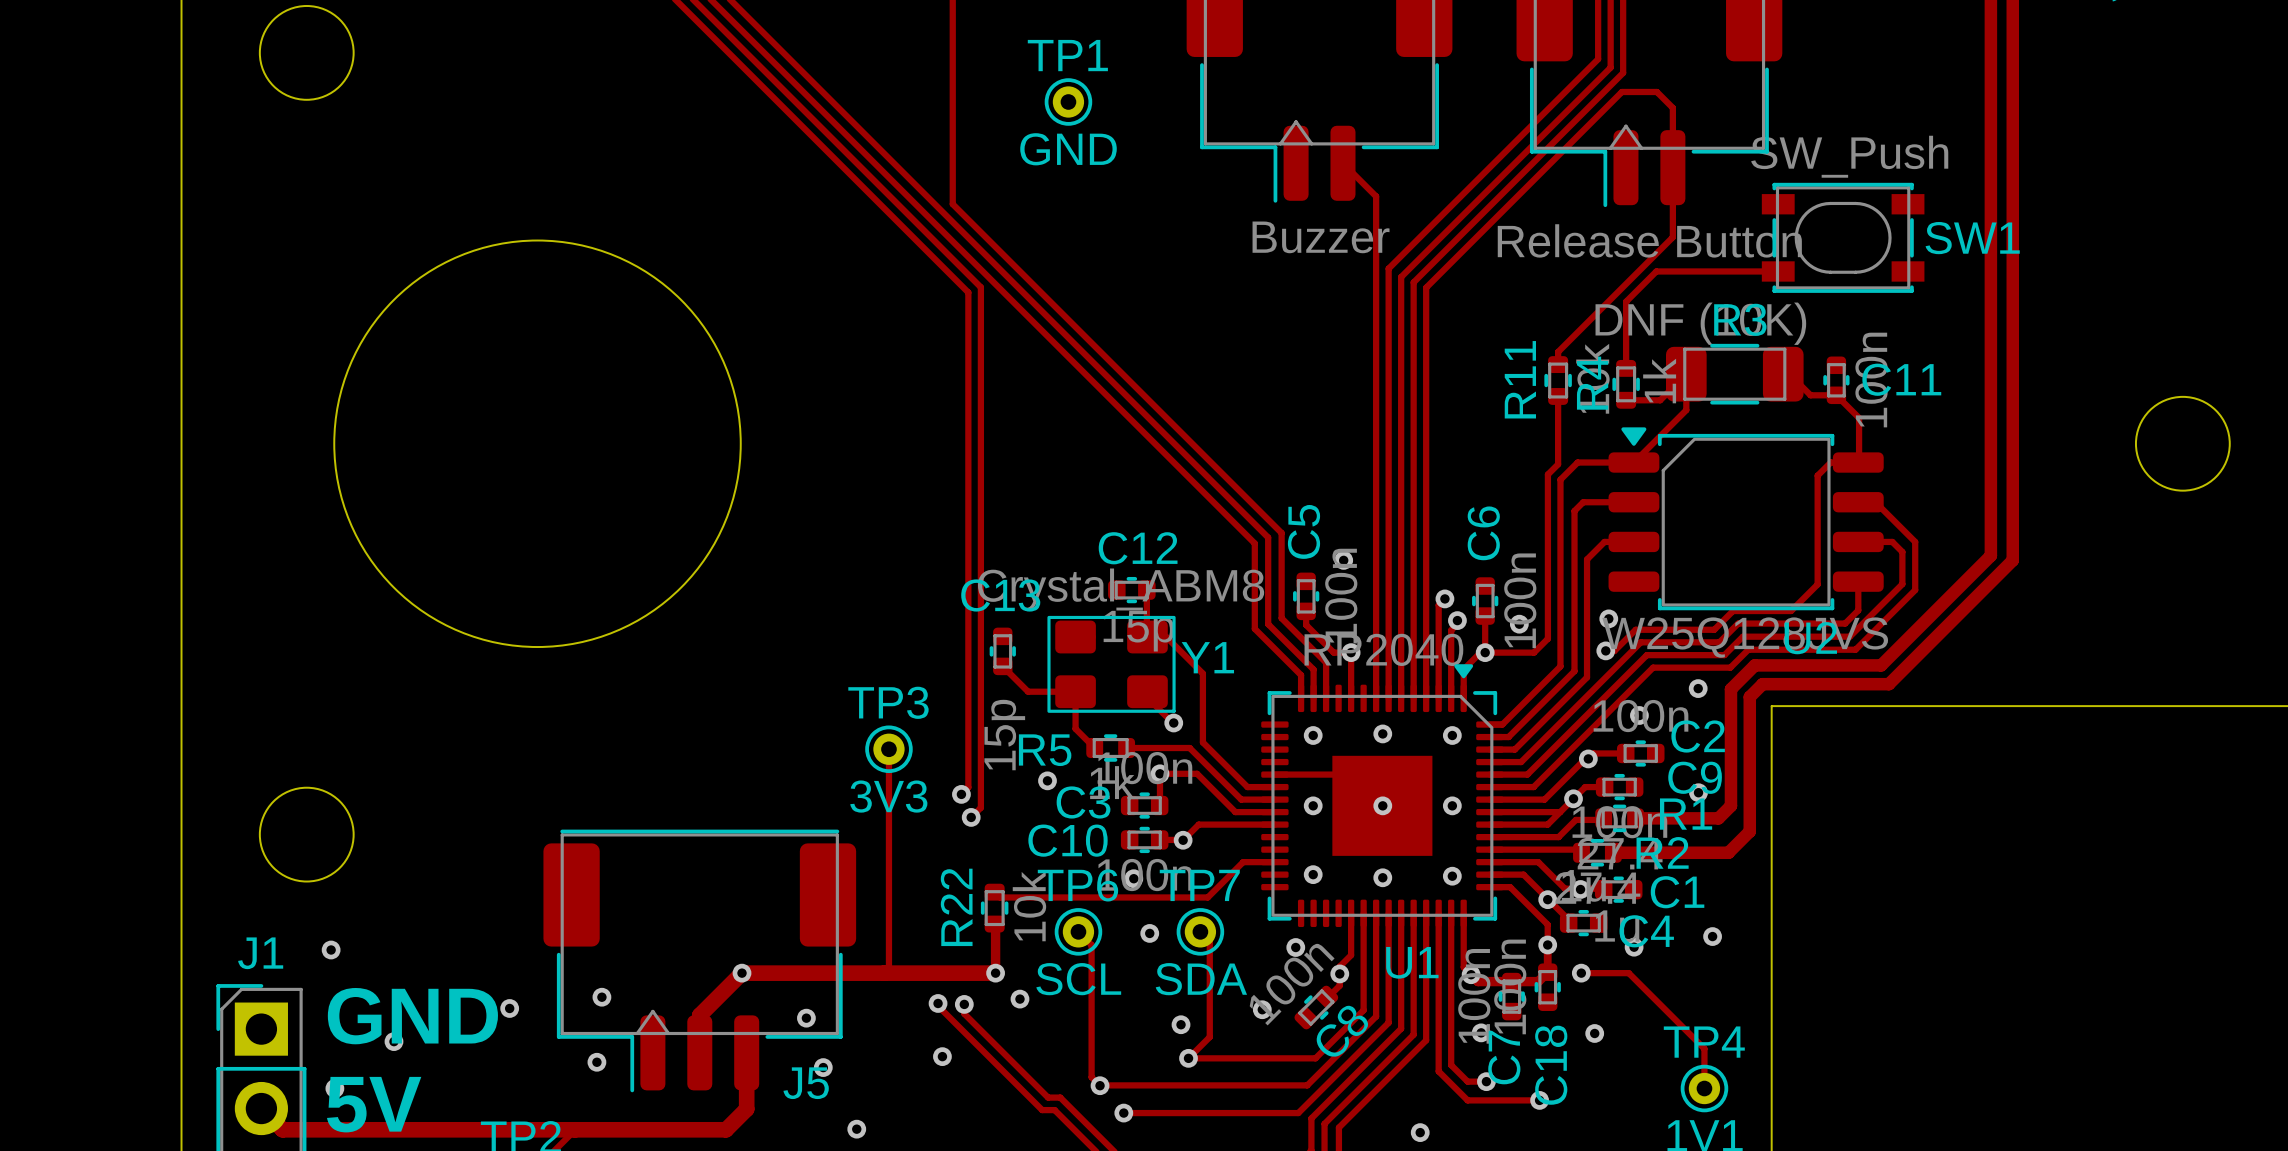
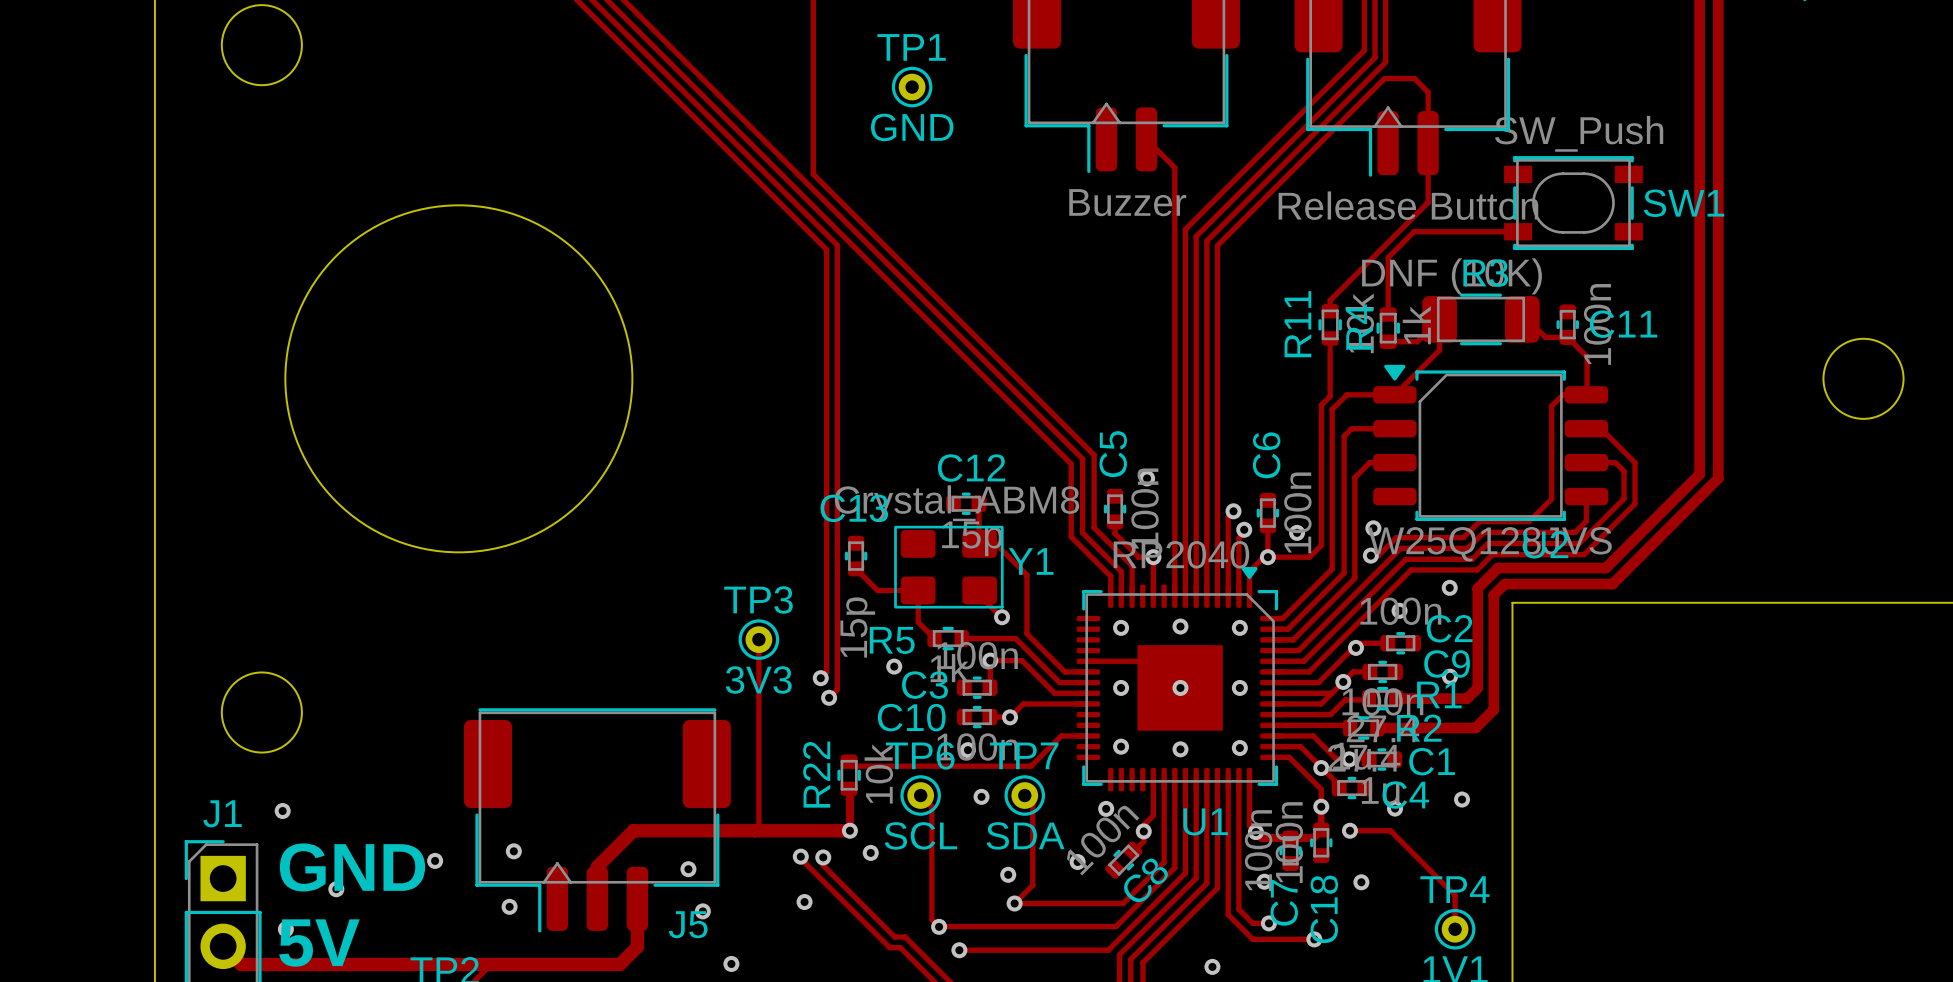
via: (742, 973) -> none

